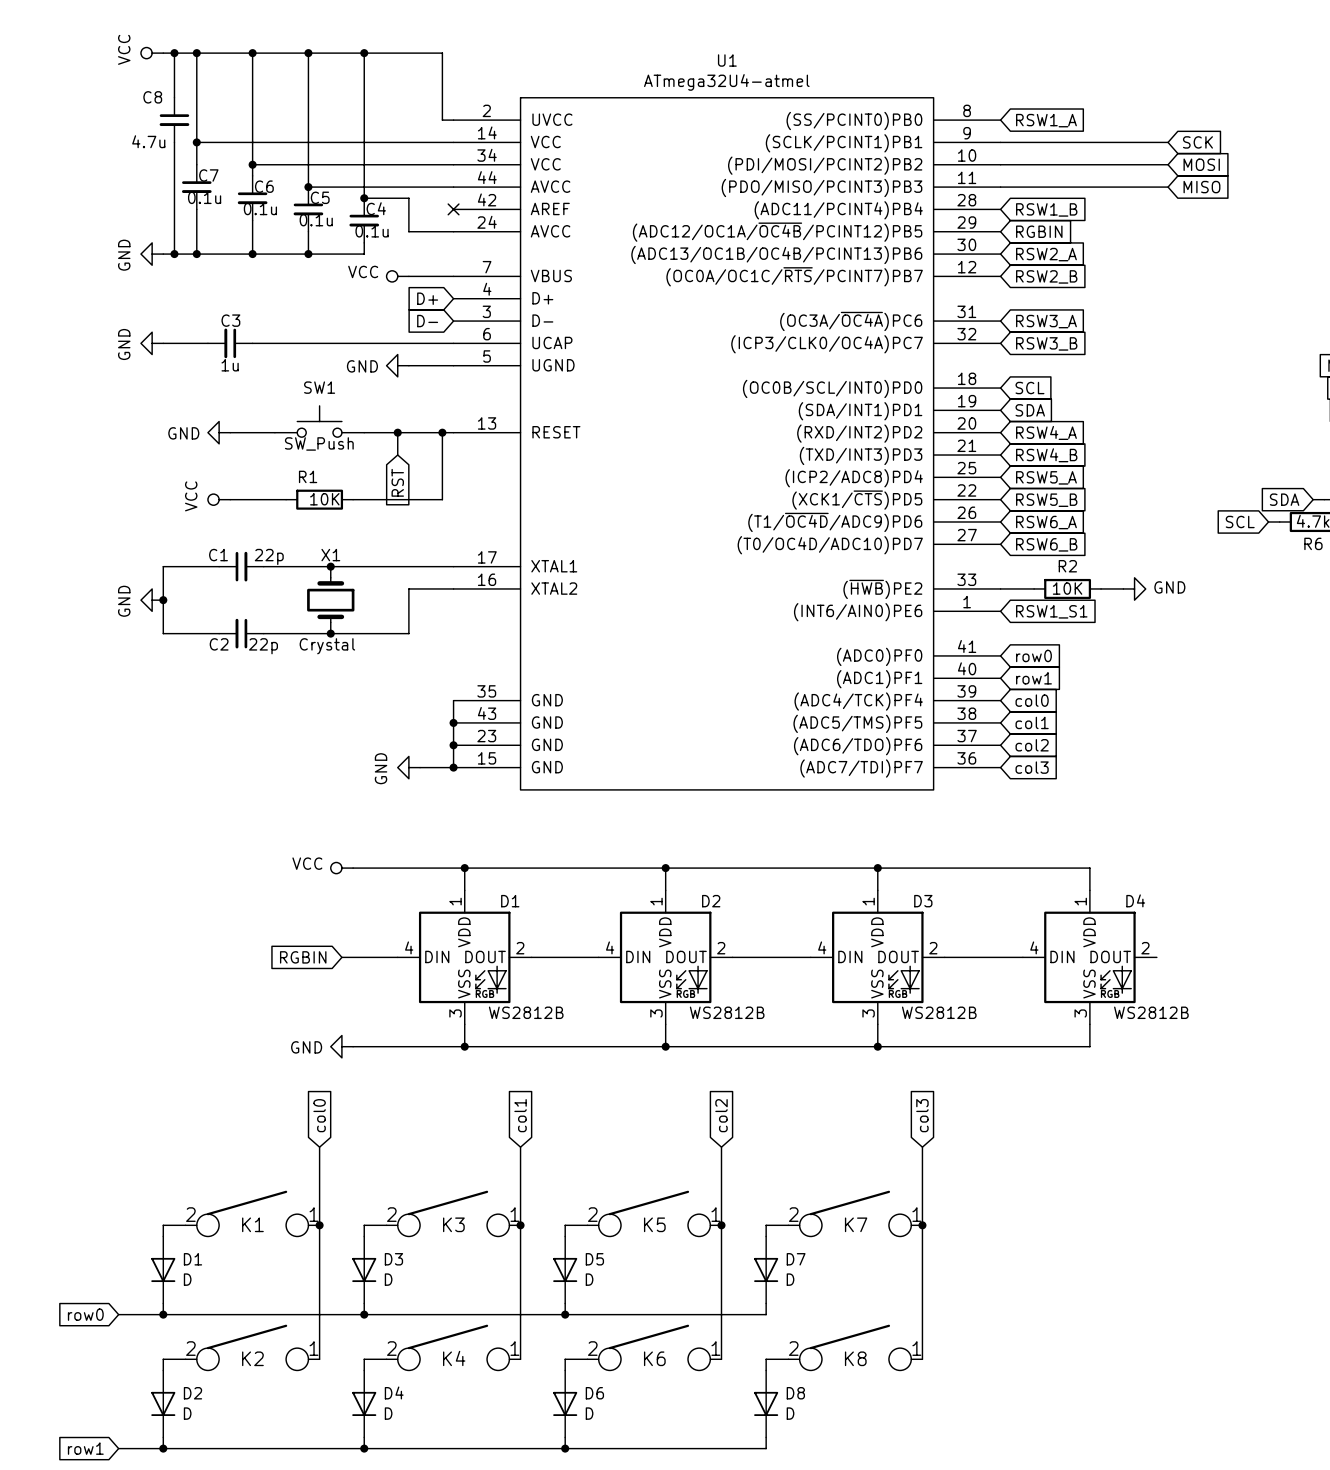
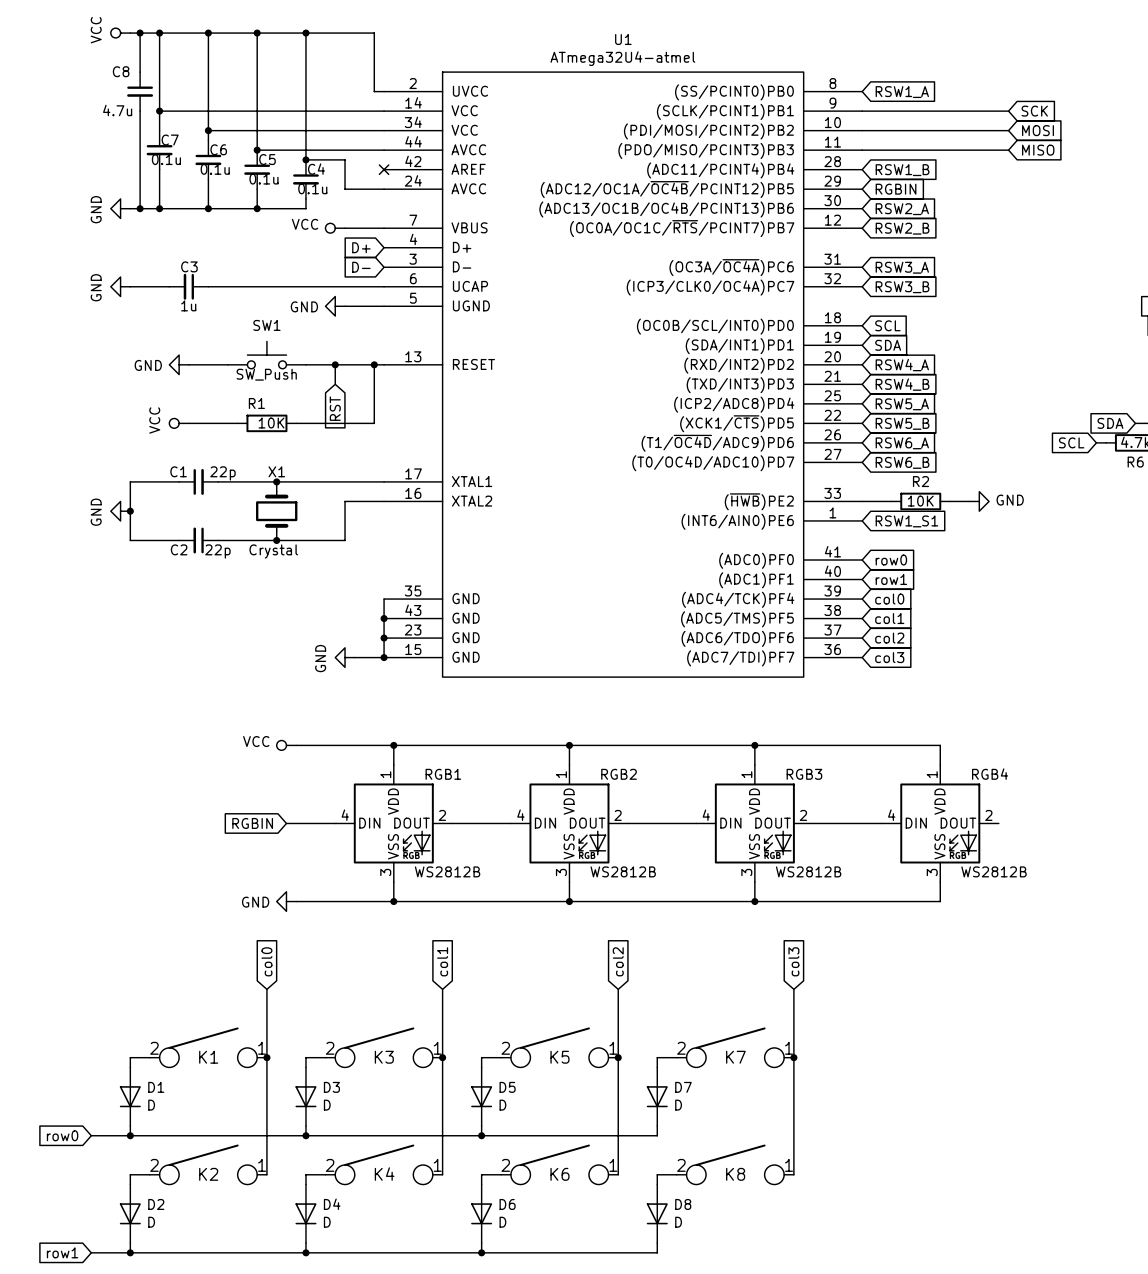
D4 name: D4 (1135, 900) -> RGB4 (990, 774)
D1 name: D1 (510, 901) -> RGB1 (443, 774)
D2 name: D2 (711, 901) -> RGB2 (619, 774)
D3 name: D3 (923, 901) -> RGB3 (804, 774)

